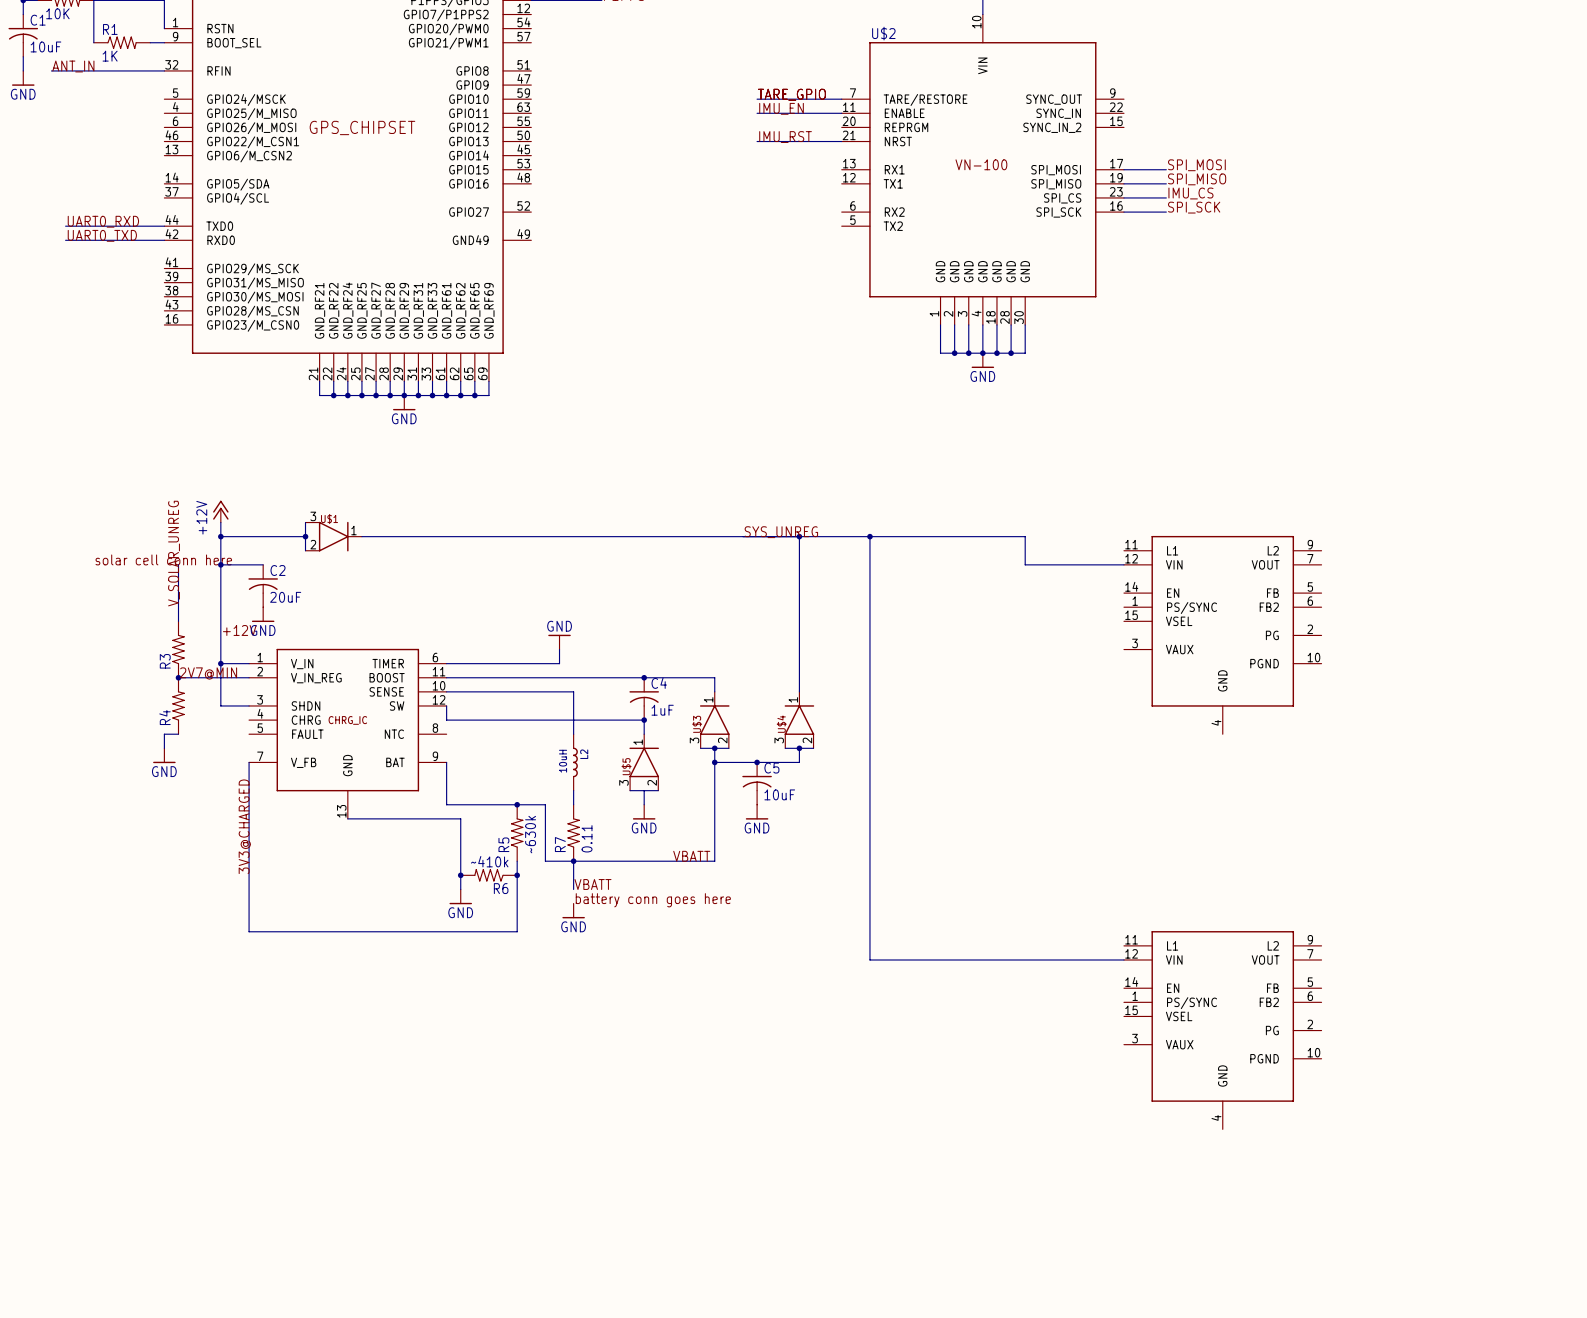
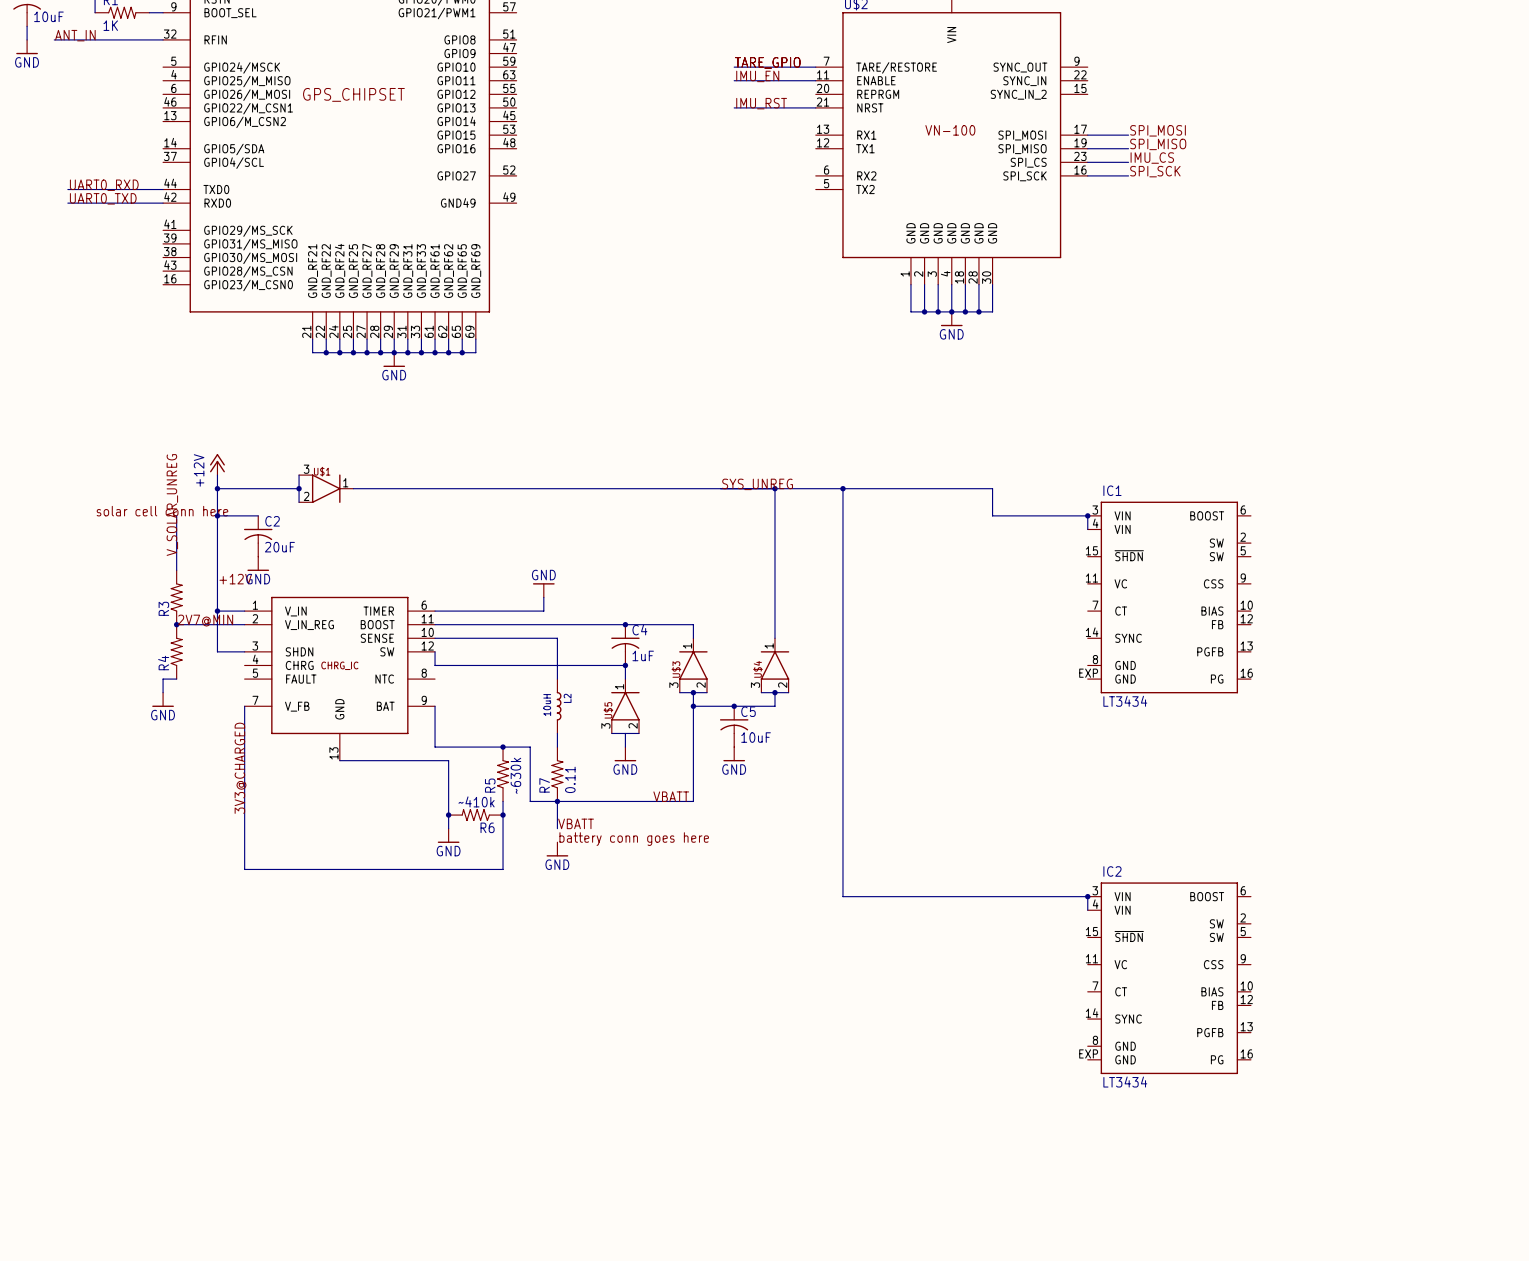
wire: none -> (1087, 515) (1087, 529)
junction: none -> (1087, 515)
part: (1222, 635) -> none
IC1: none -> LT3434 (1169, 597)
wire: none -> (1087, 896) (1087, 910)
junction: none -> (1087, 896)
part: (1222, 1030) -> none
IC2: none -> LT3434 (1169, 978)

